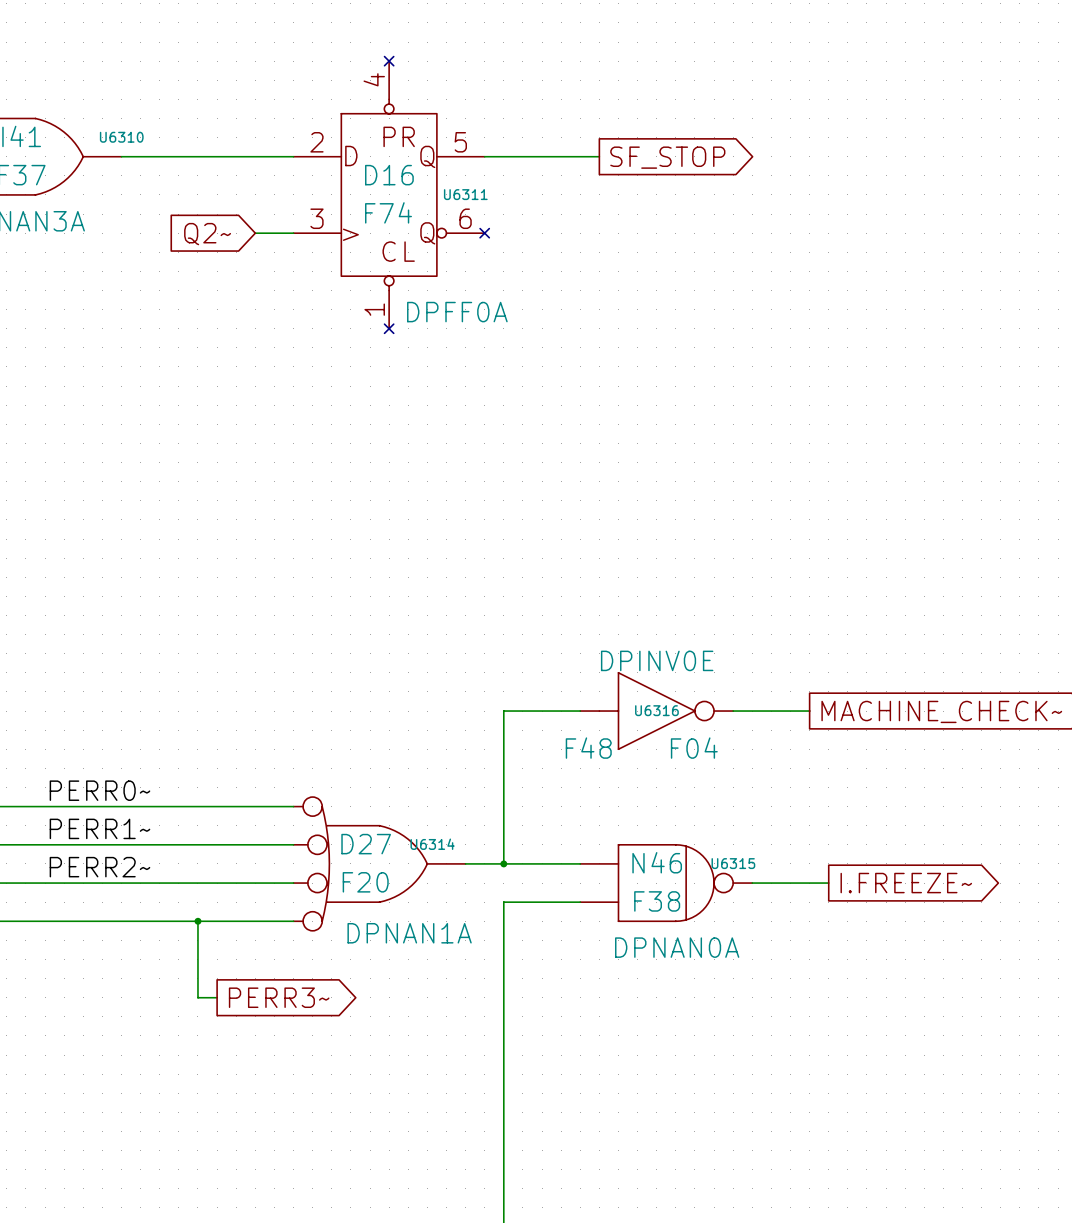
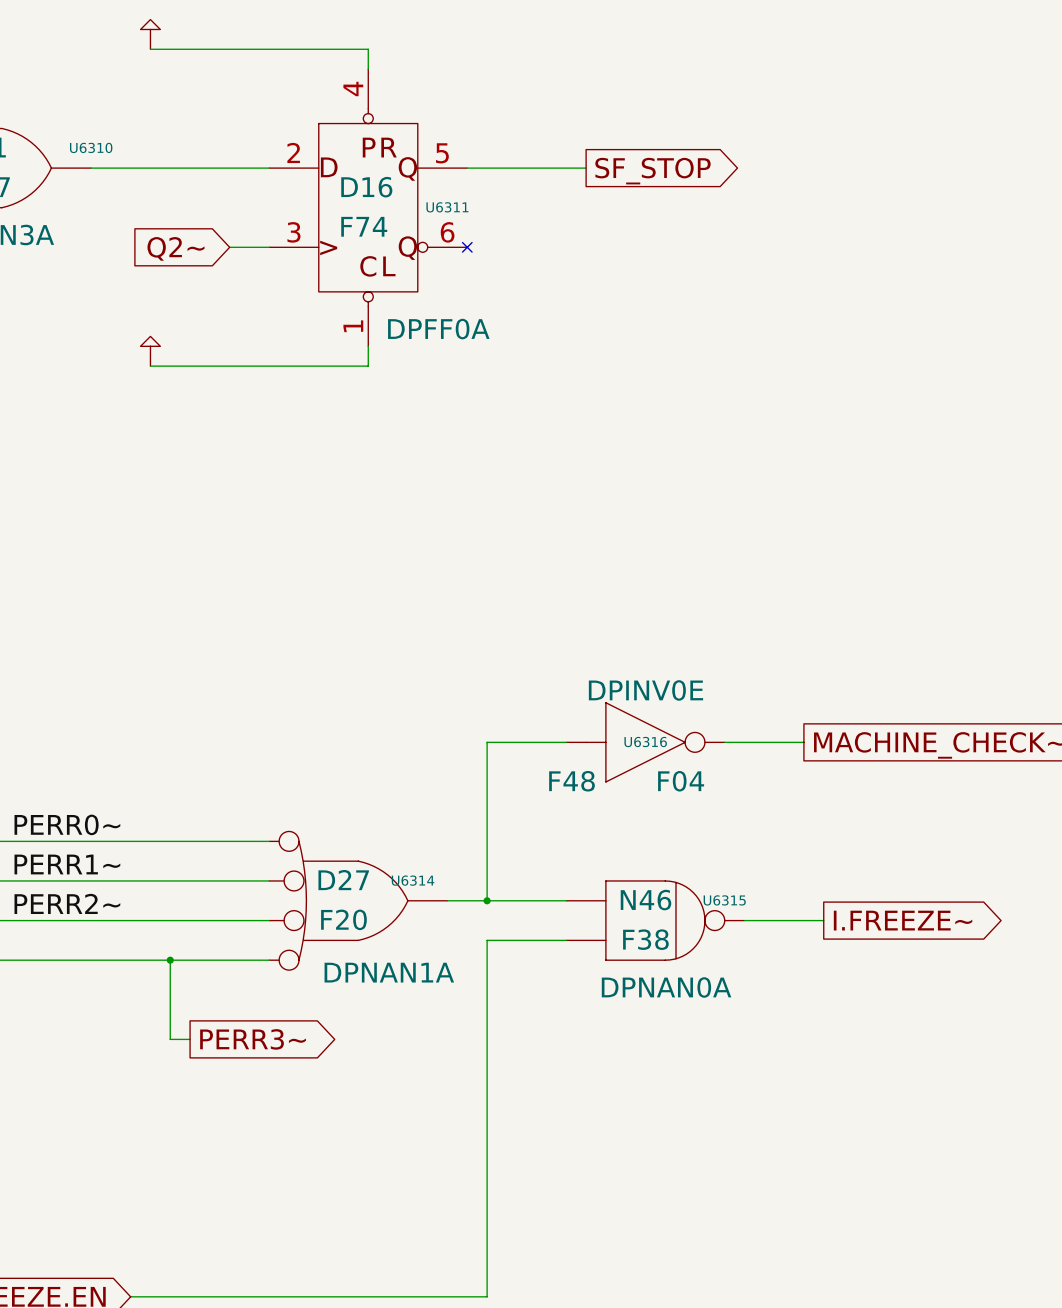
power symbol: none -> (150, 34)
wire: none -> (150, 49) (368, 49) (368, 69)
no-connect mark: (389, 61) -> none
wire: none -> (368, 346) (368, 366) (150, 366)
no-connect mark: (389, 328) -> none
power symbol: none -> (150, 350)

